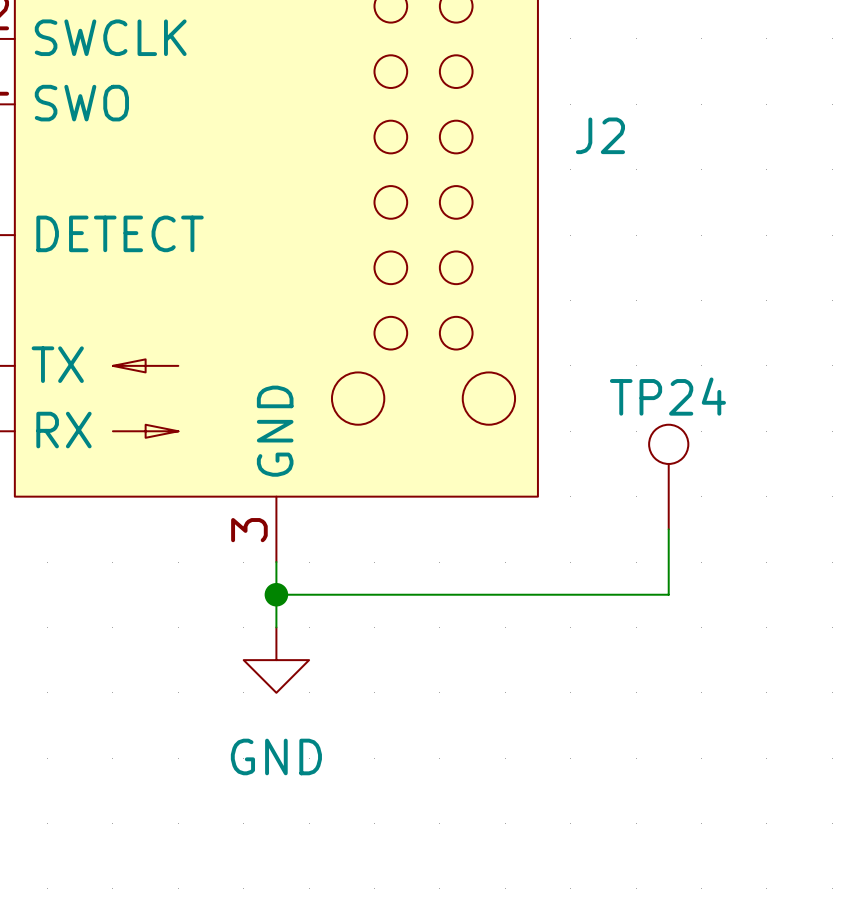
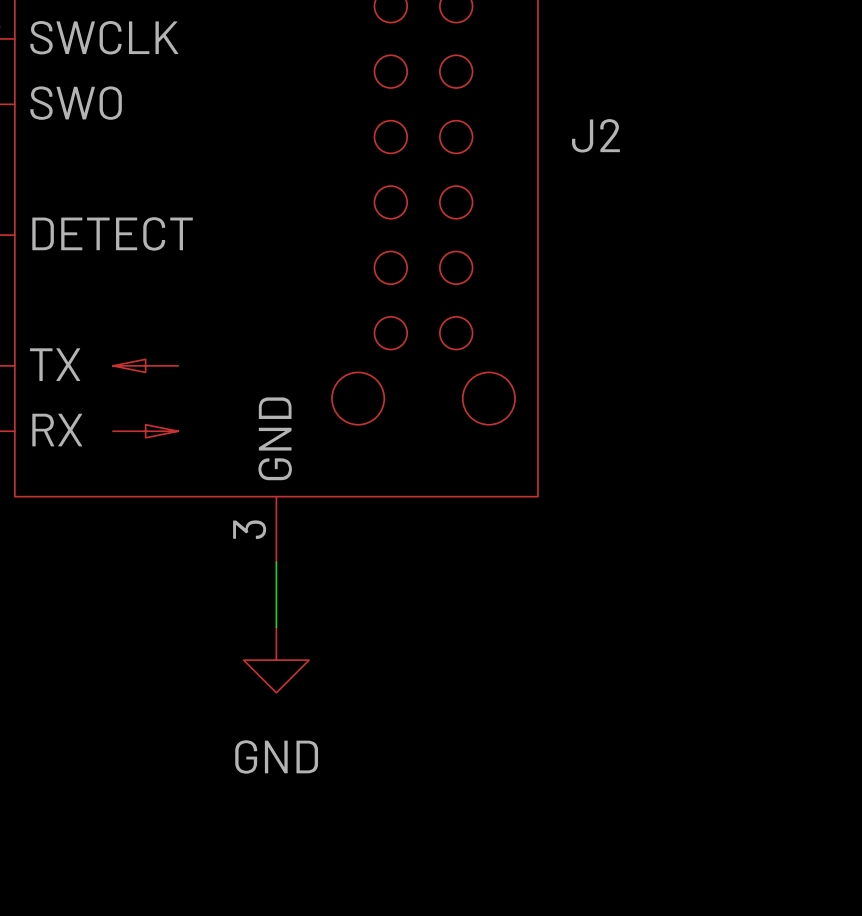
TP24: (668, 477) -> none
wire: (668, 529) (668, 594) (276, 594) -> none
junction: (276, 594) -> none

